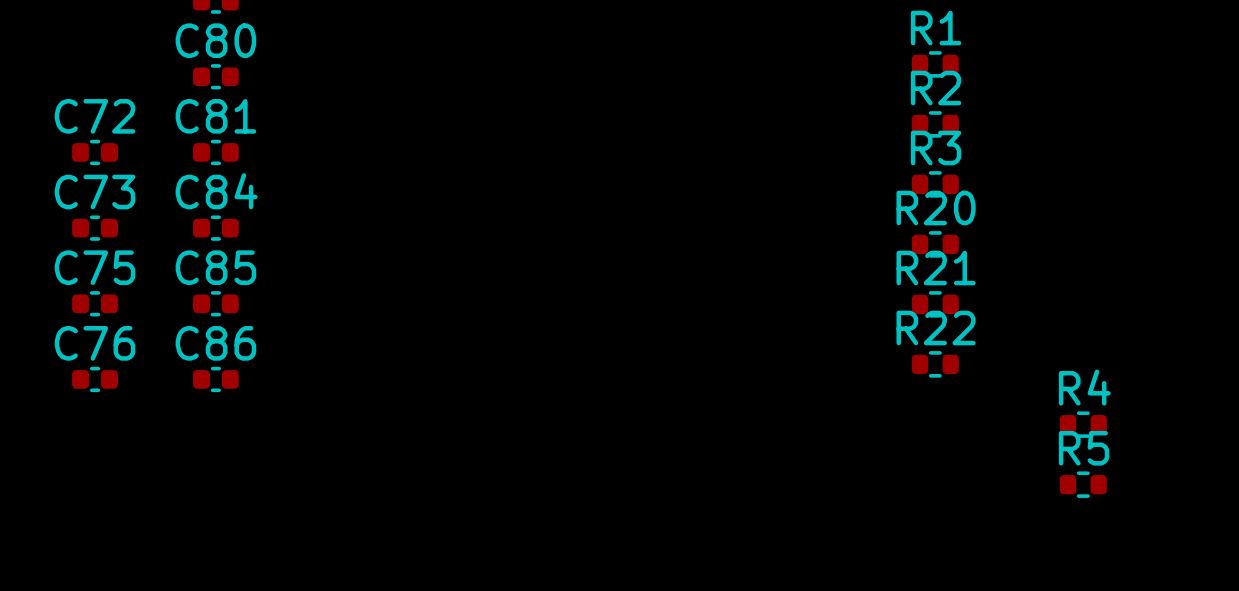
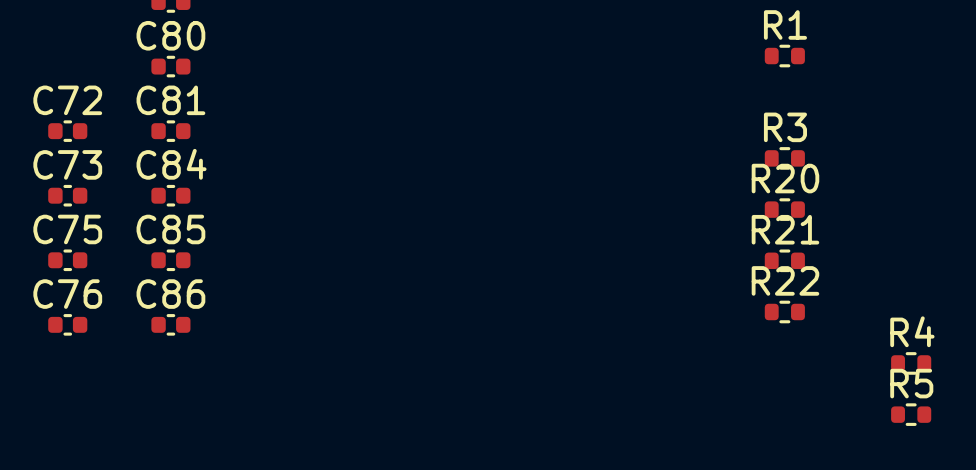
R2: (935, 124) -> none

